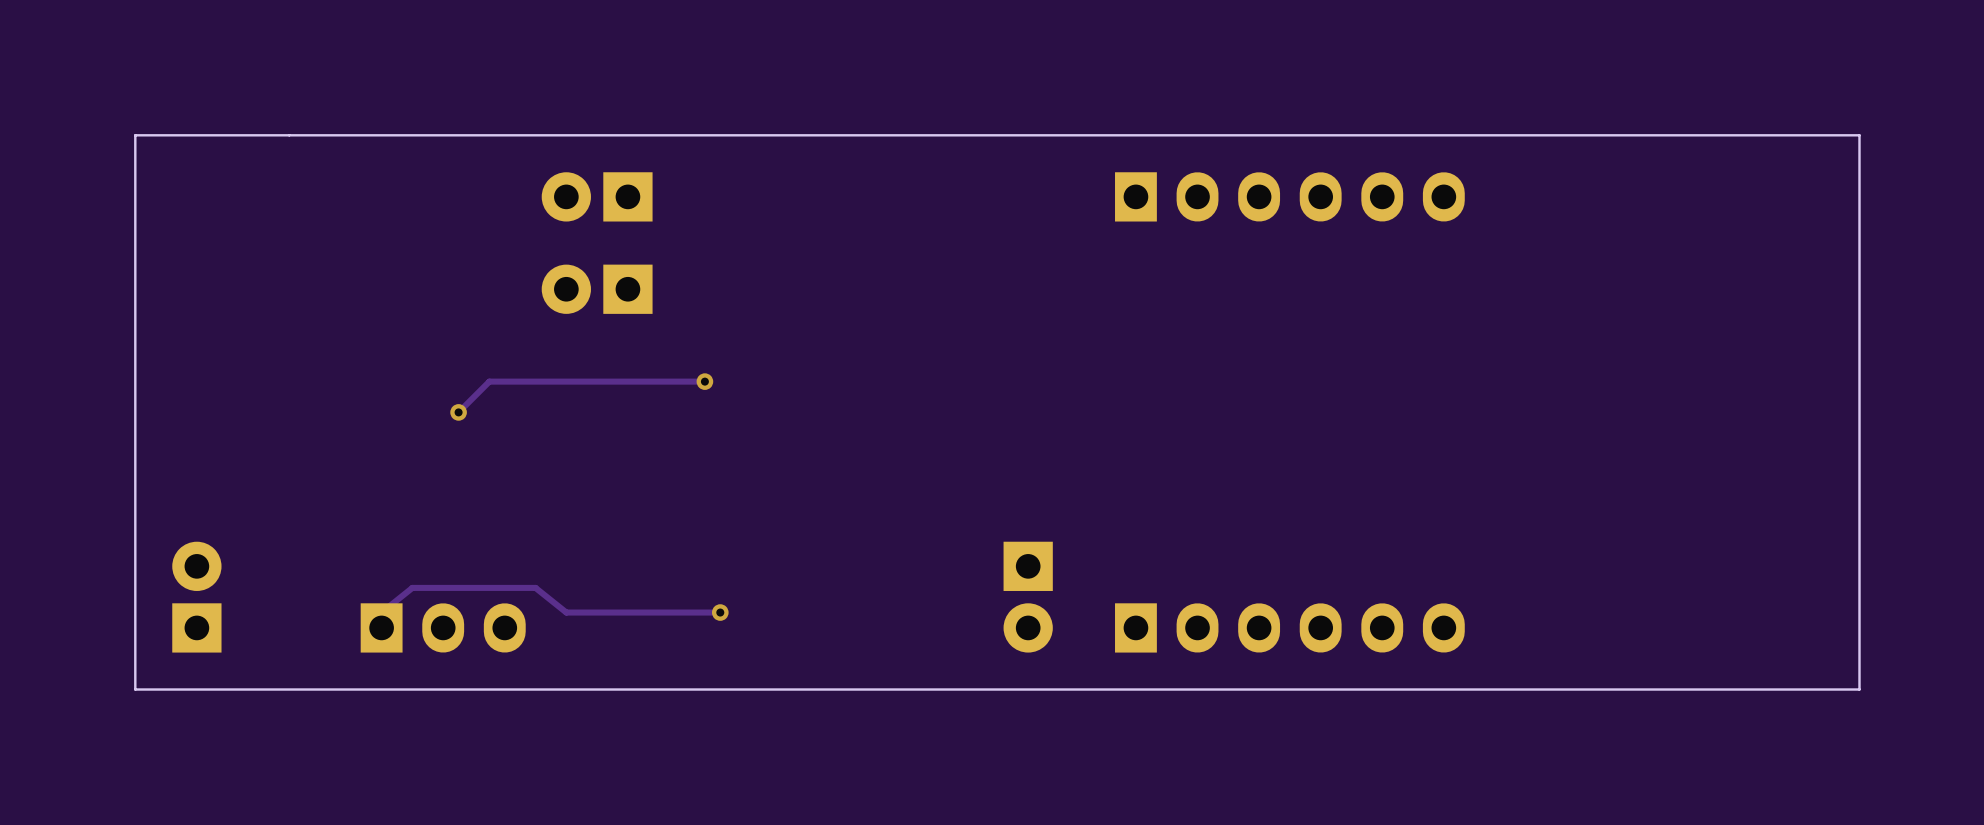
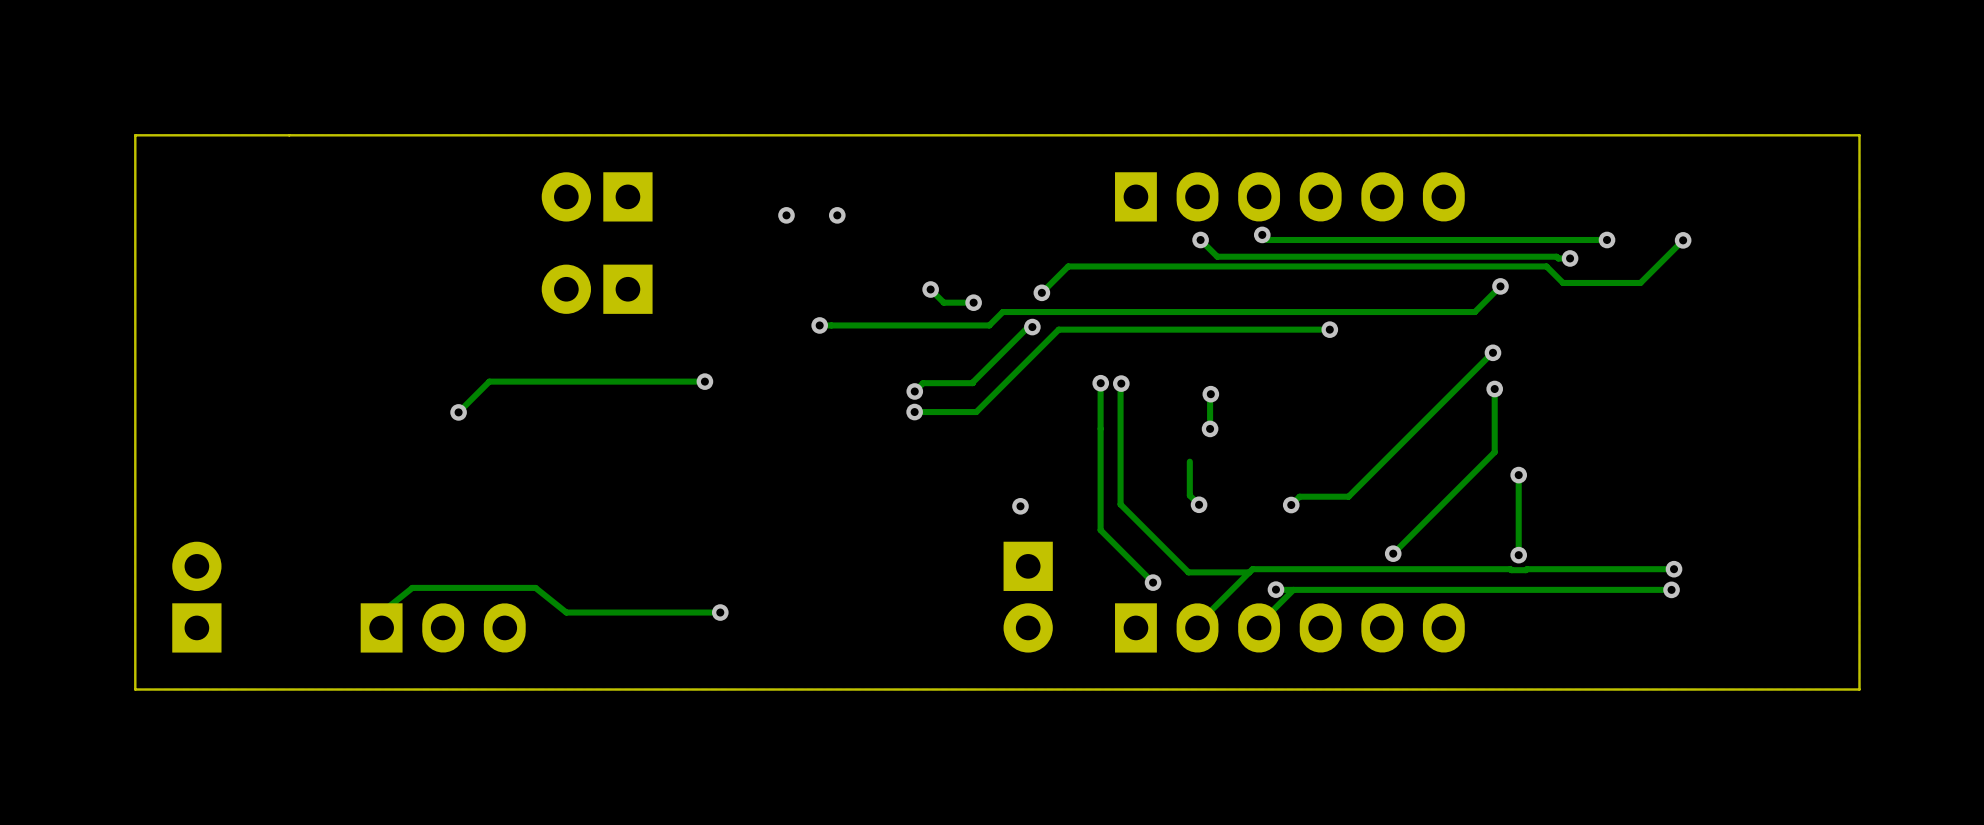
via: none -> (786, 215)
via: none -> (837, 215)
track: none -> (1262, 234) (1267, 239) (1607, 239)
via: none -> (1262, 234)
track: none -> (1200, 239) (1217, 256) (1556, 256) (1558, 258) (1570, 258)
via: none -> (1200, 239)
via: none -> (1607, 239)
track: none -> (1683, 240) (1640, 282) (1563, 282) (1546, 266) (1068, 266) (1041, 292)
via: none -> (1683, 240)
via: none -> (1570, 258)
track: none -> (1500, 286) (1474, 312) (1002, 312) (989, 325) (819, 325)
via: none -> (1500, 286)
track: none -> (930, 289) (943, 302) (973, 302)
via: none -> (930, 289)
via: none -> (1041, 292)
via: none -> (973, 302)
via: none -> (819, 325)
track: none -> (1032, 327) (1028, 327) (972, 383) (923, 383) (914, 391)
via: none -> (1032, 327)
track: none -> (1329, 329) (1058, 329) (976, 412) (914, 412)
via: none -> (1329, 329)
track: none -> (1492, 352) (1348, 496) (1299, 496) (1291, 505)
via: none -> (1492, 352)
track: none -> (1100, 383) (1100, 530) (1153, 582)
via: none -> (1100, 383)
track: none -> (1121, 383) (1120, 504) (1188, 572) (1249, 572)
via: none -> (1121, 383)
track: none -> (1494, 389) (1494, 452) (1393, 553)
via: none -> (1494, 389)
via: none -> (914, 391)
track: none -> (1210, 394) (1210, 428)
via: none -> (1210, 394)
via: none -> (914, 412)
via: none -> (1210, 428)
track: none -> (1189, 461) (1189, 495) (1199, 504)
track: none -> (1518, 475) (1518, 555)
via: none -> (1518, 475)
via: none -> (1199, 504)
via: none -> (1291, 505)
via: none -> (1020, 506)
via: none -> (1393, 553)
via: none -> (1518, 555)
track: none -> (1674, 569) (1252, 569) (1197, 624) (1197, 627)
via: none -> (1674, 569)
via: none -> (1153, 582)
via: none -> (1275, 589)
track: none -> (1293, 589) (1259, 624) (1259, 627)
track: none -> (1671, 589) (1276, 589)
via: none -> (1671, 589)

